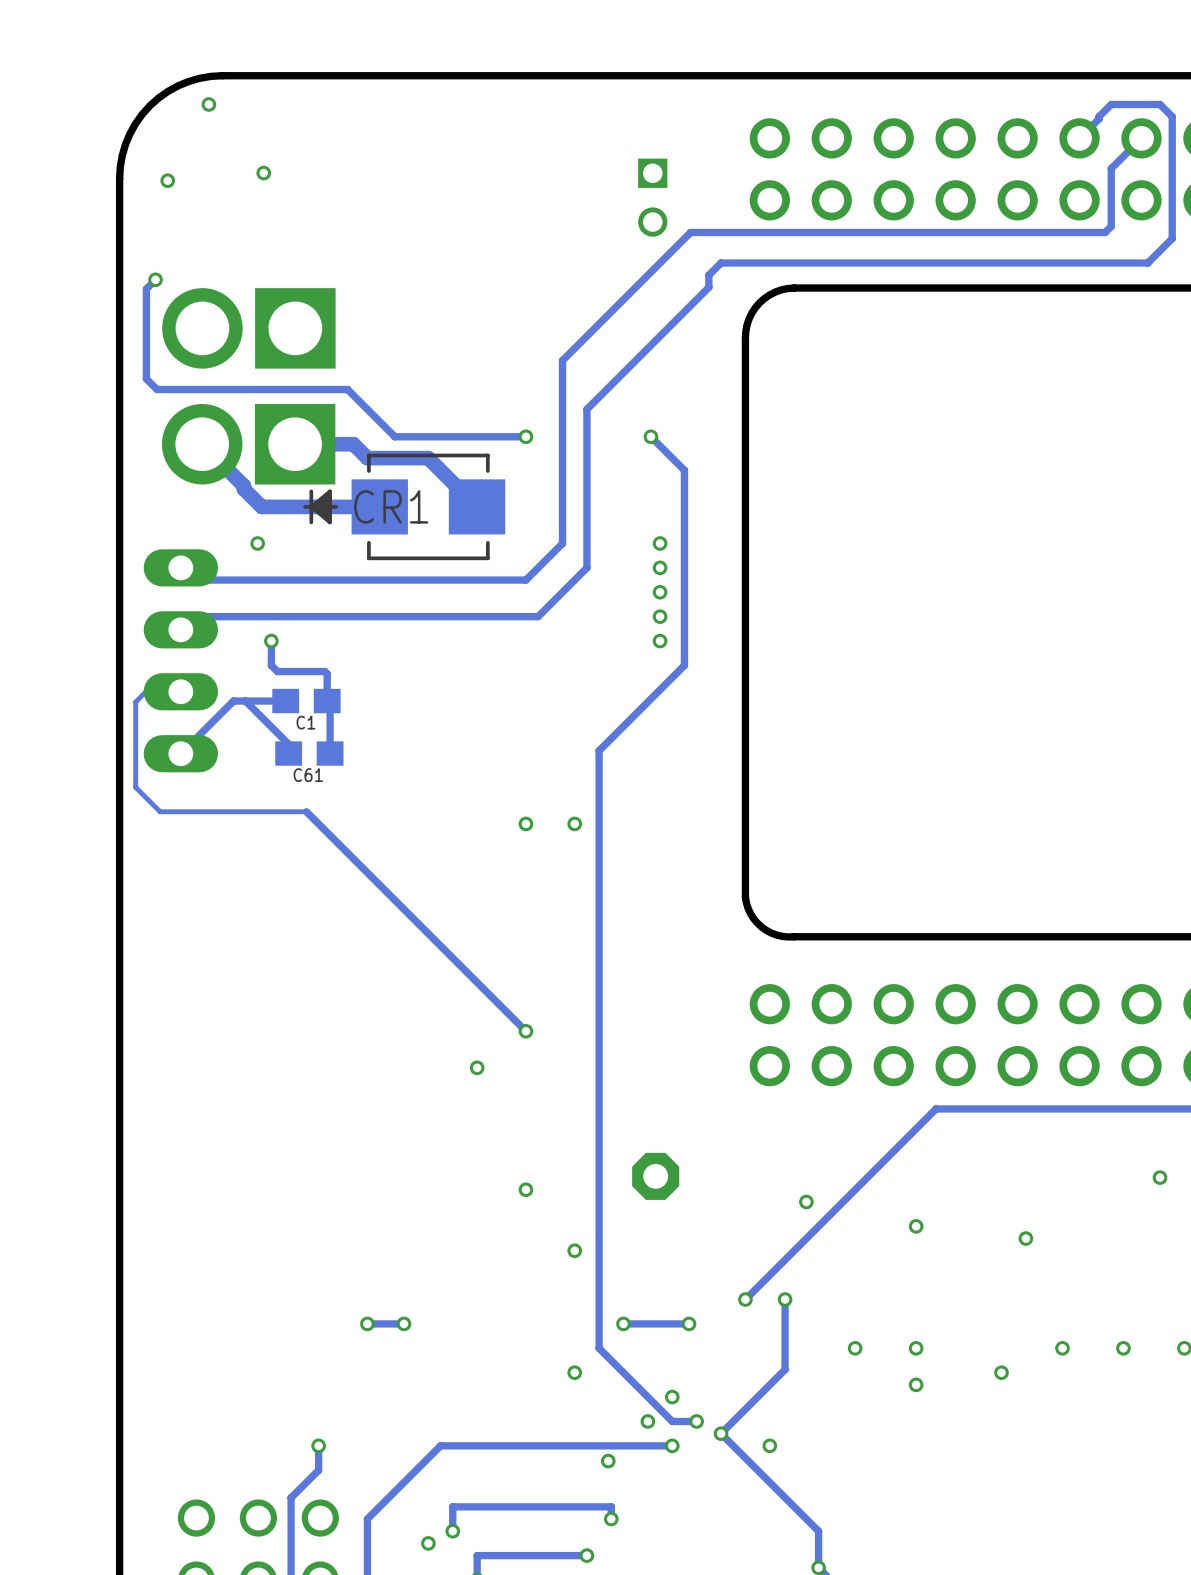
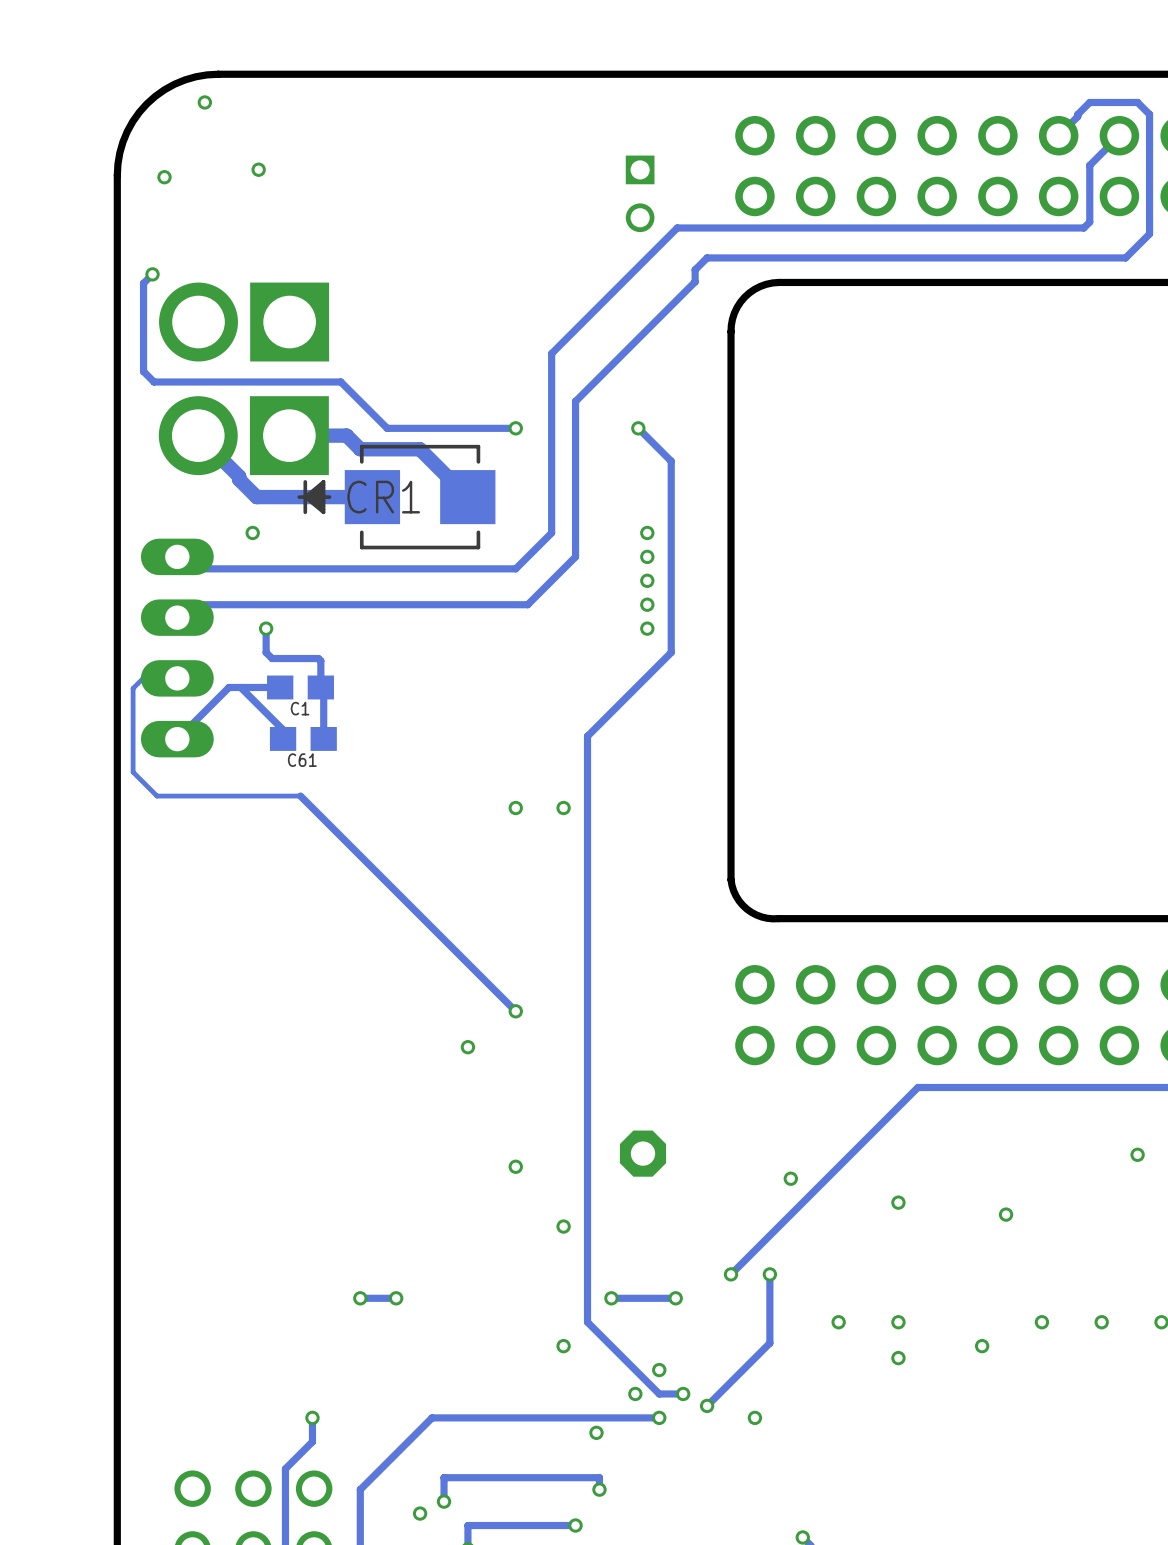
track: (721, 1433) (818, 1531) (818, 1567) -> none

